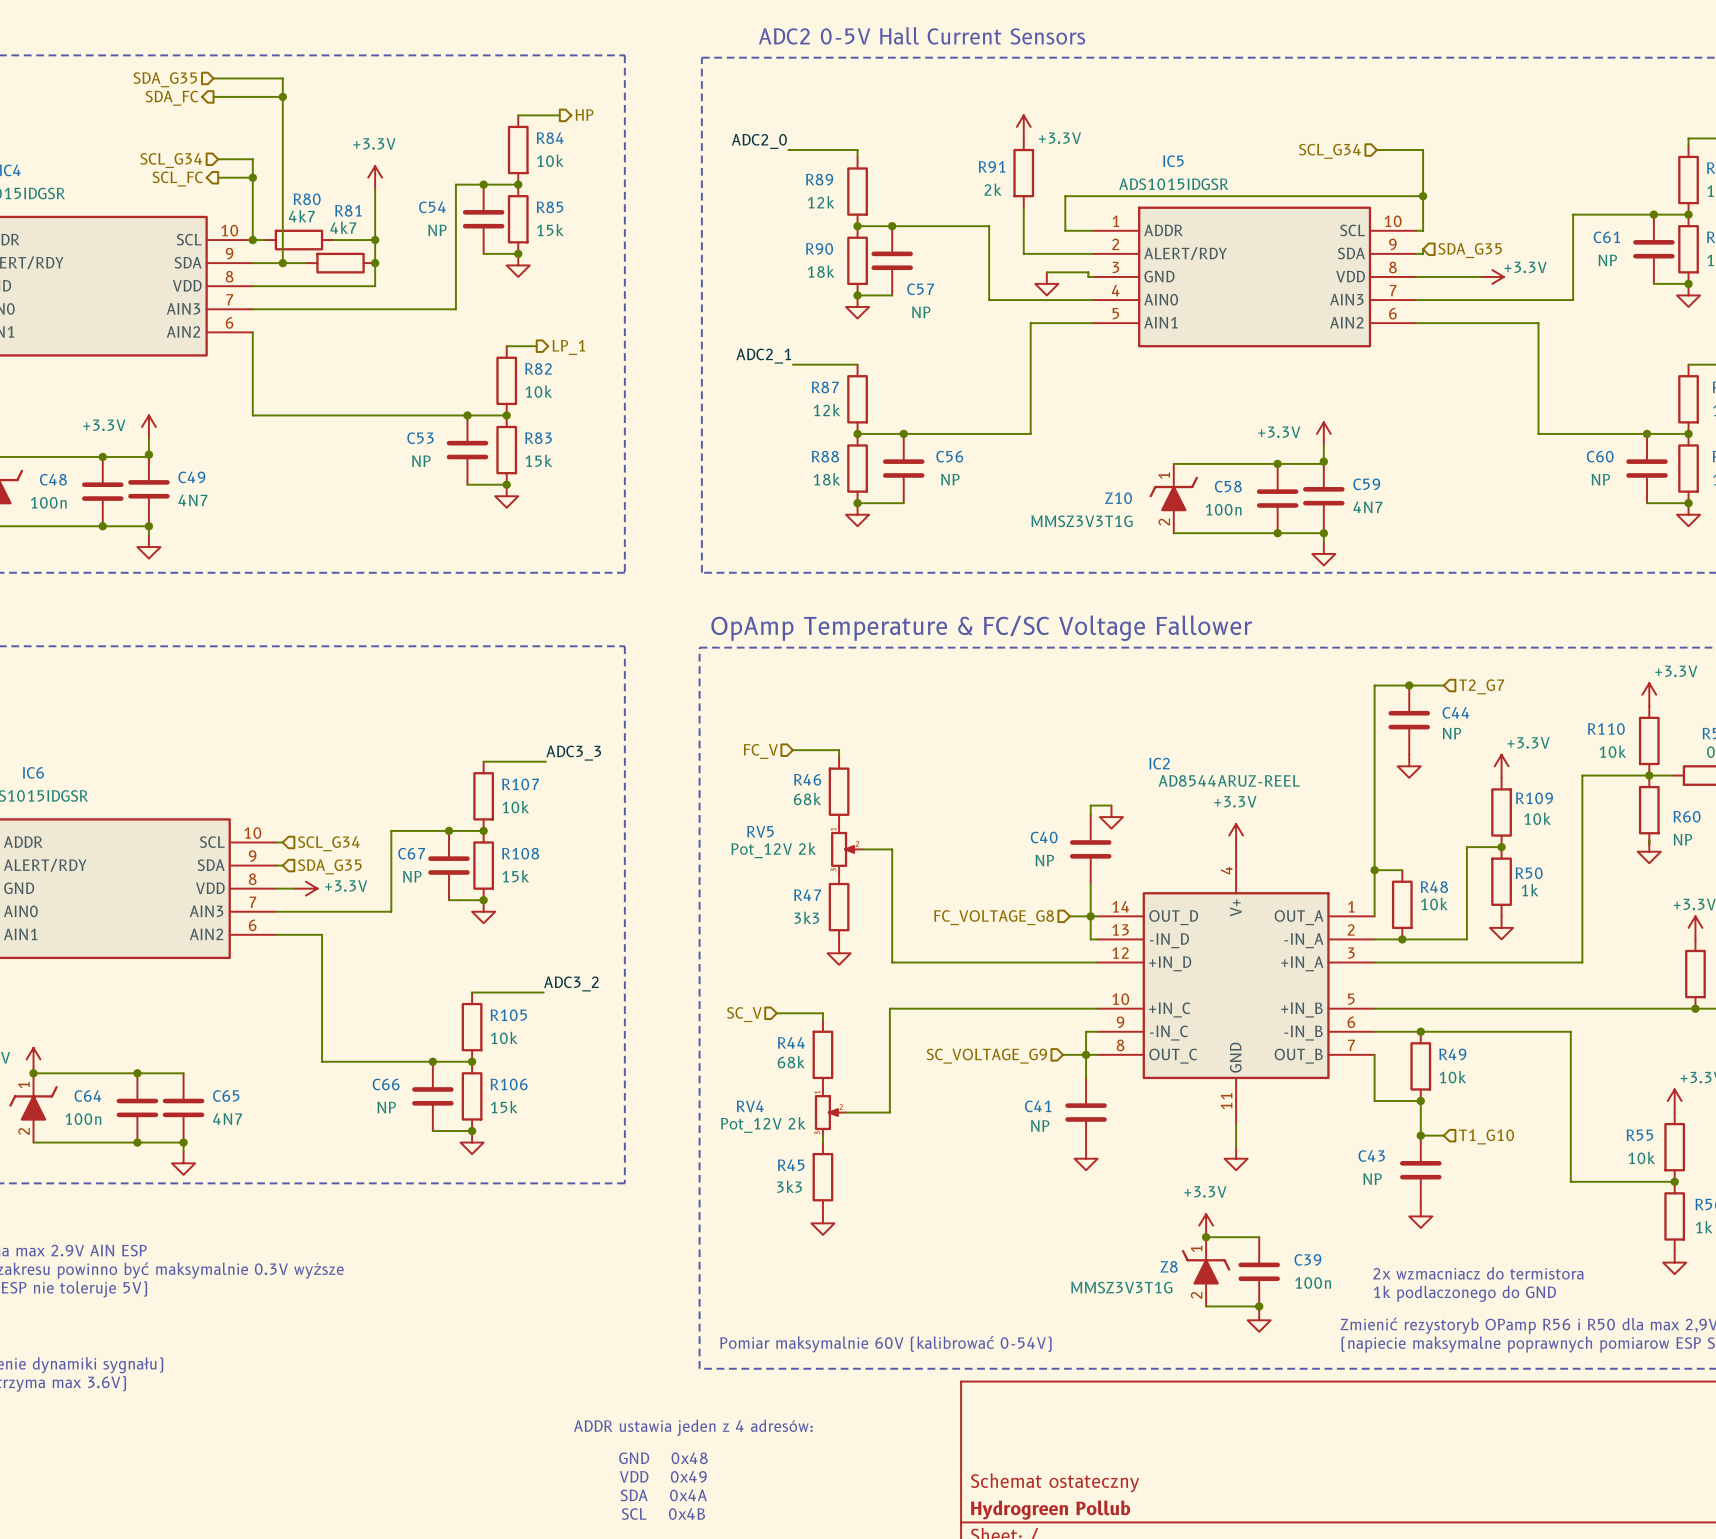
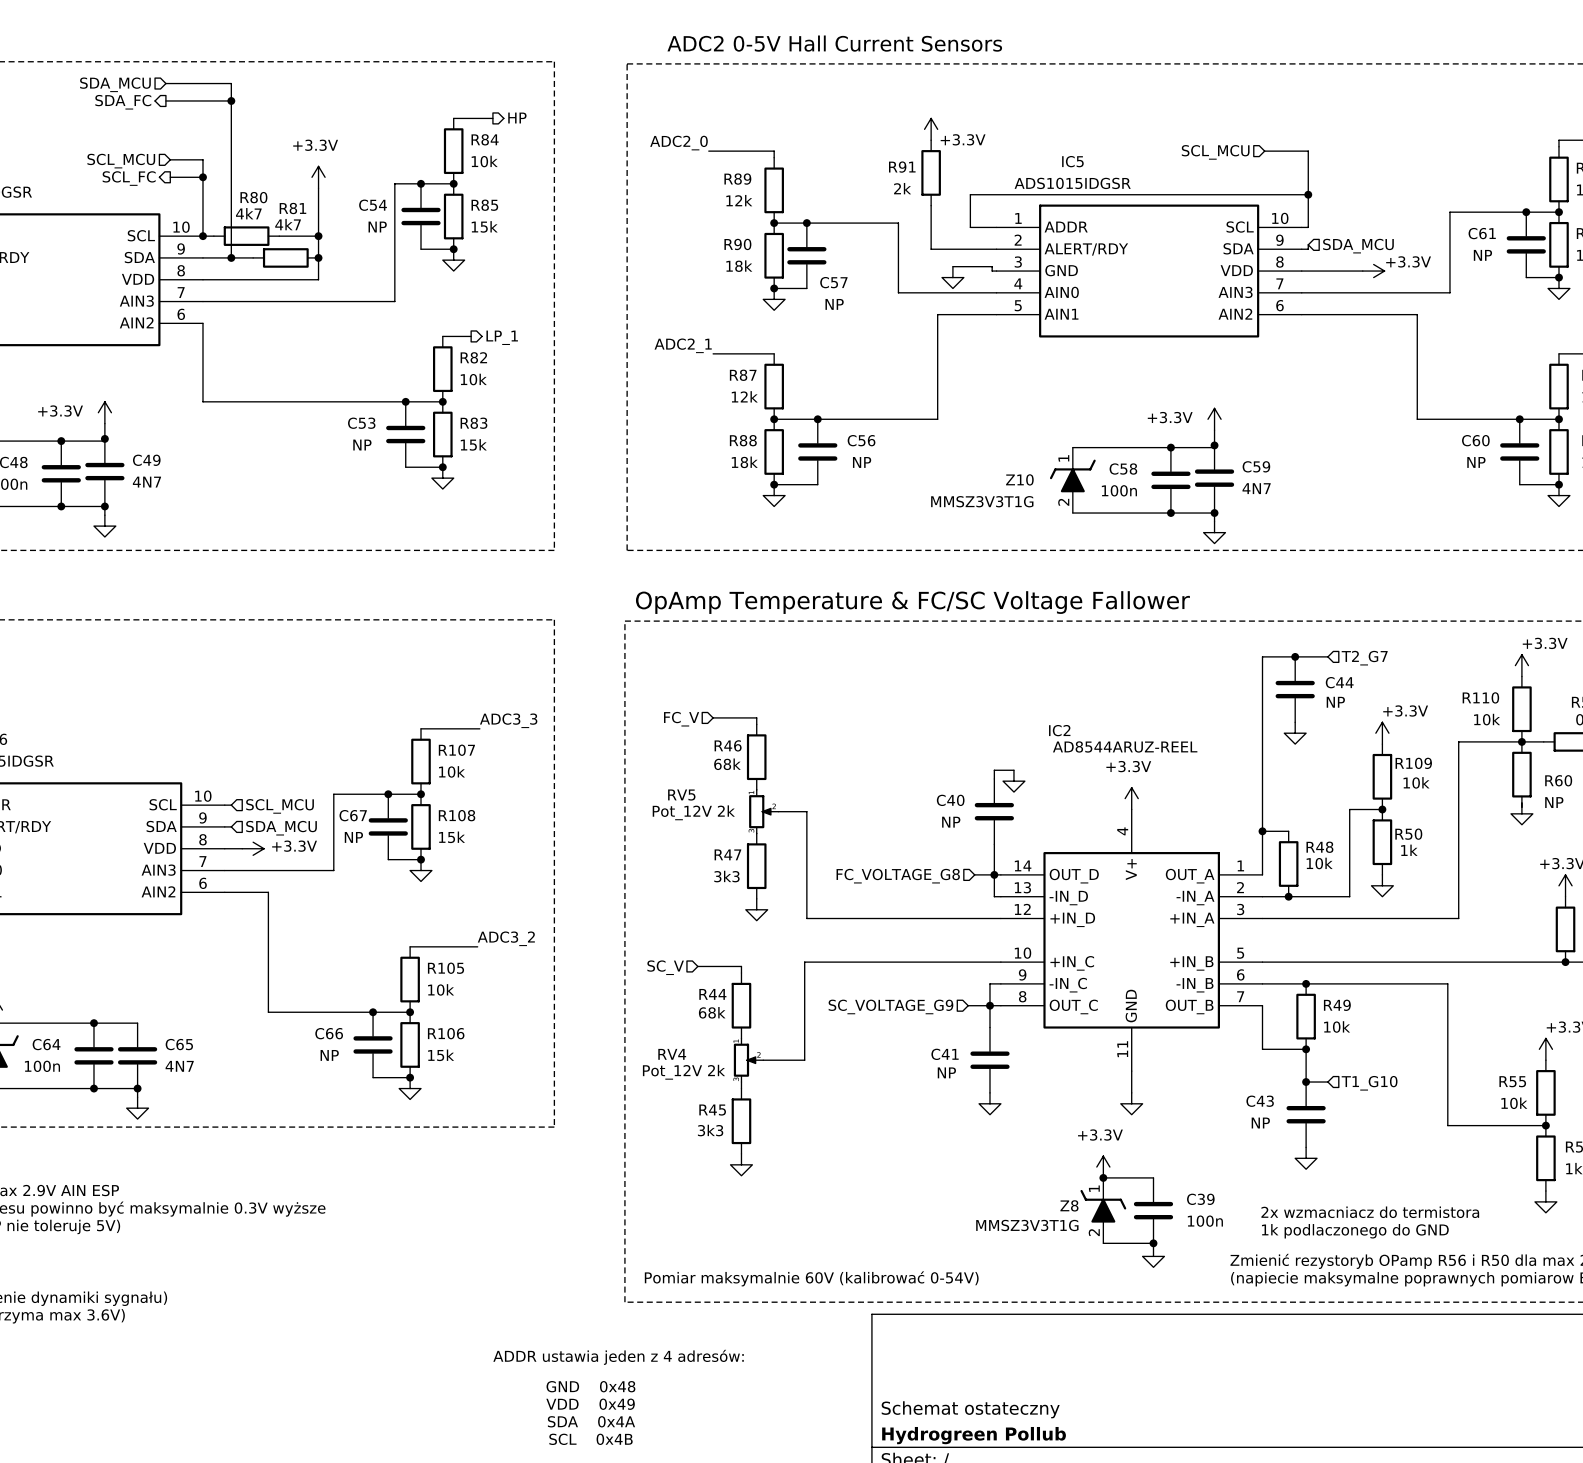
hierarchical label: SDA_G35 (165, 79) -> SDA_MCU (115, 84)
hierarchical label: SCL_G34 (1329, 151) -> SCL_MCU (1215, 152)
hierarchical label: SCL_G34 (171, 160) -> SCL_MCU (121, 161)
hierarchical label: SDA_G35 (1470, 250) -> SDA_MCU (1358, 246)
hierarchical label: SCL_G34 (328, 843) -> SCL_MCU (280, 806)
hierarchical label: SDA_G35 (329, 866) -> SDA_MCU (281, 828)

